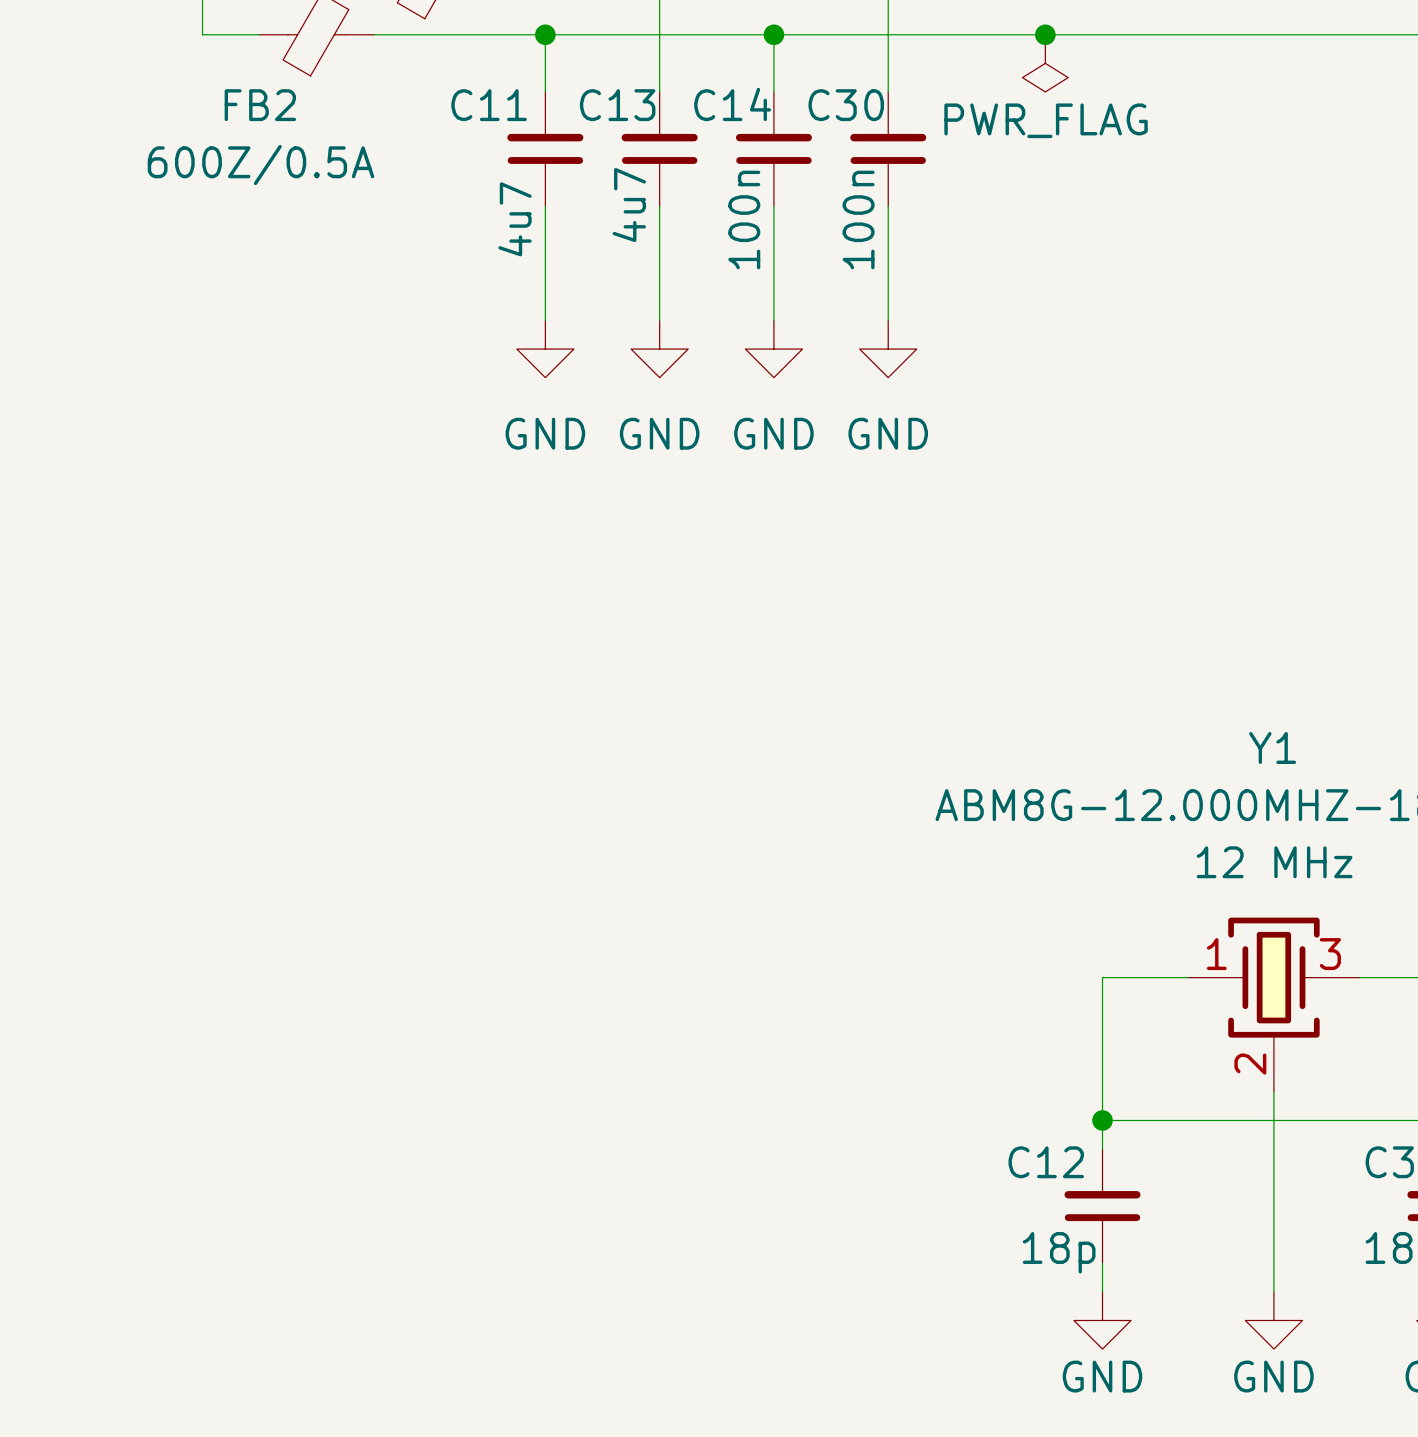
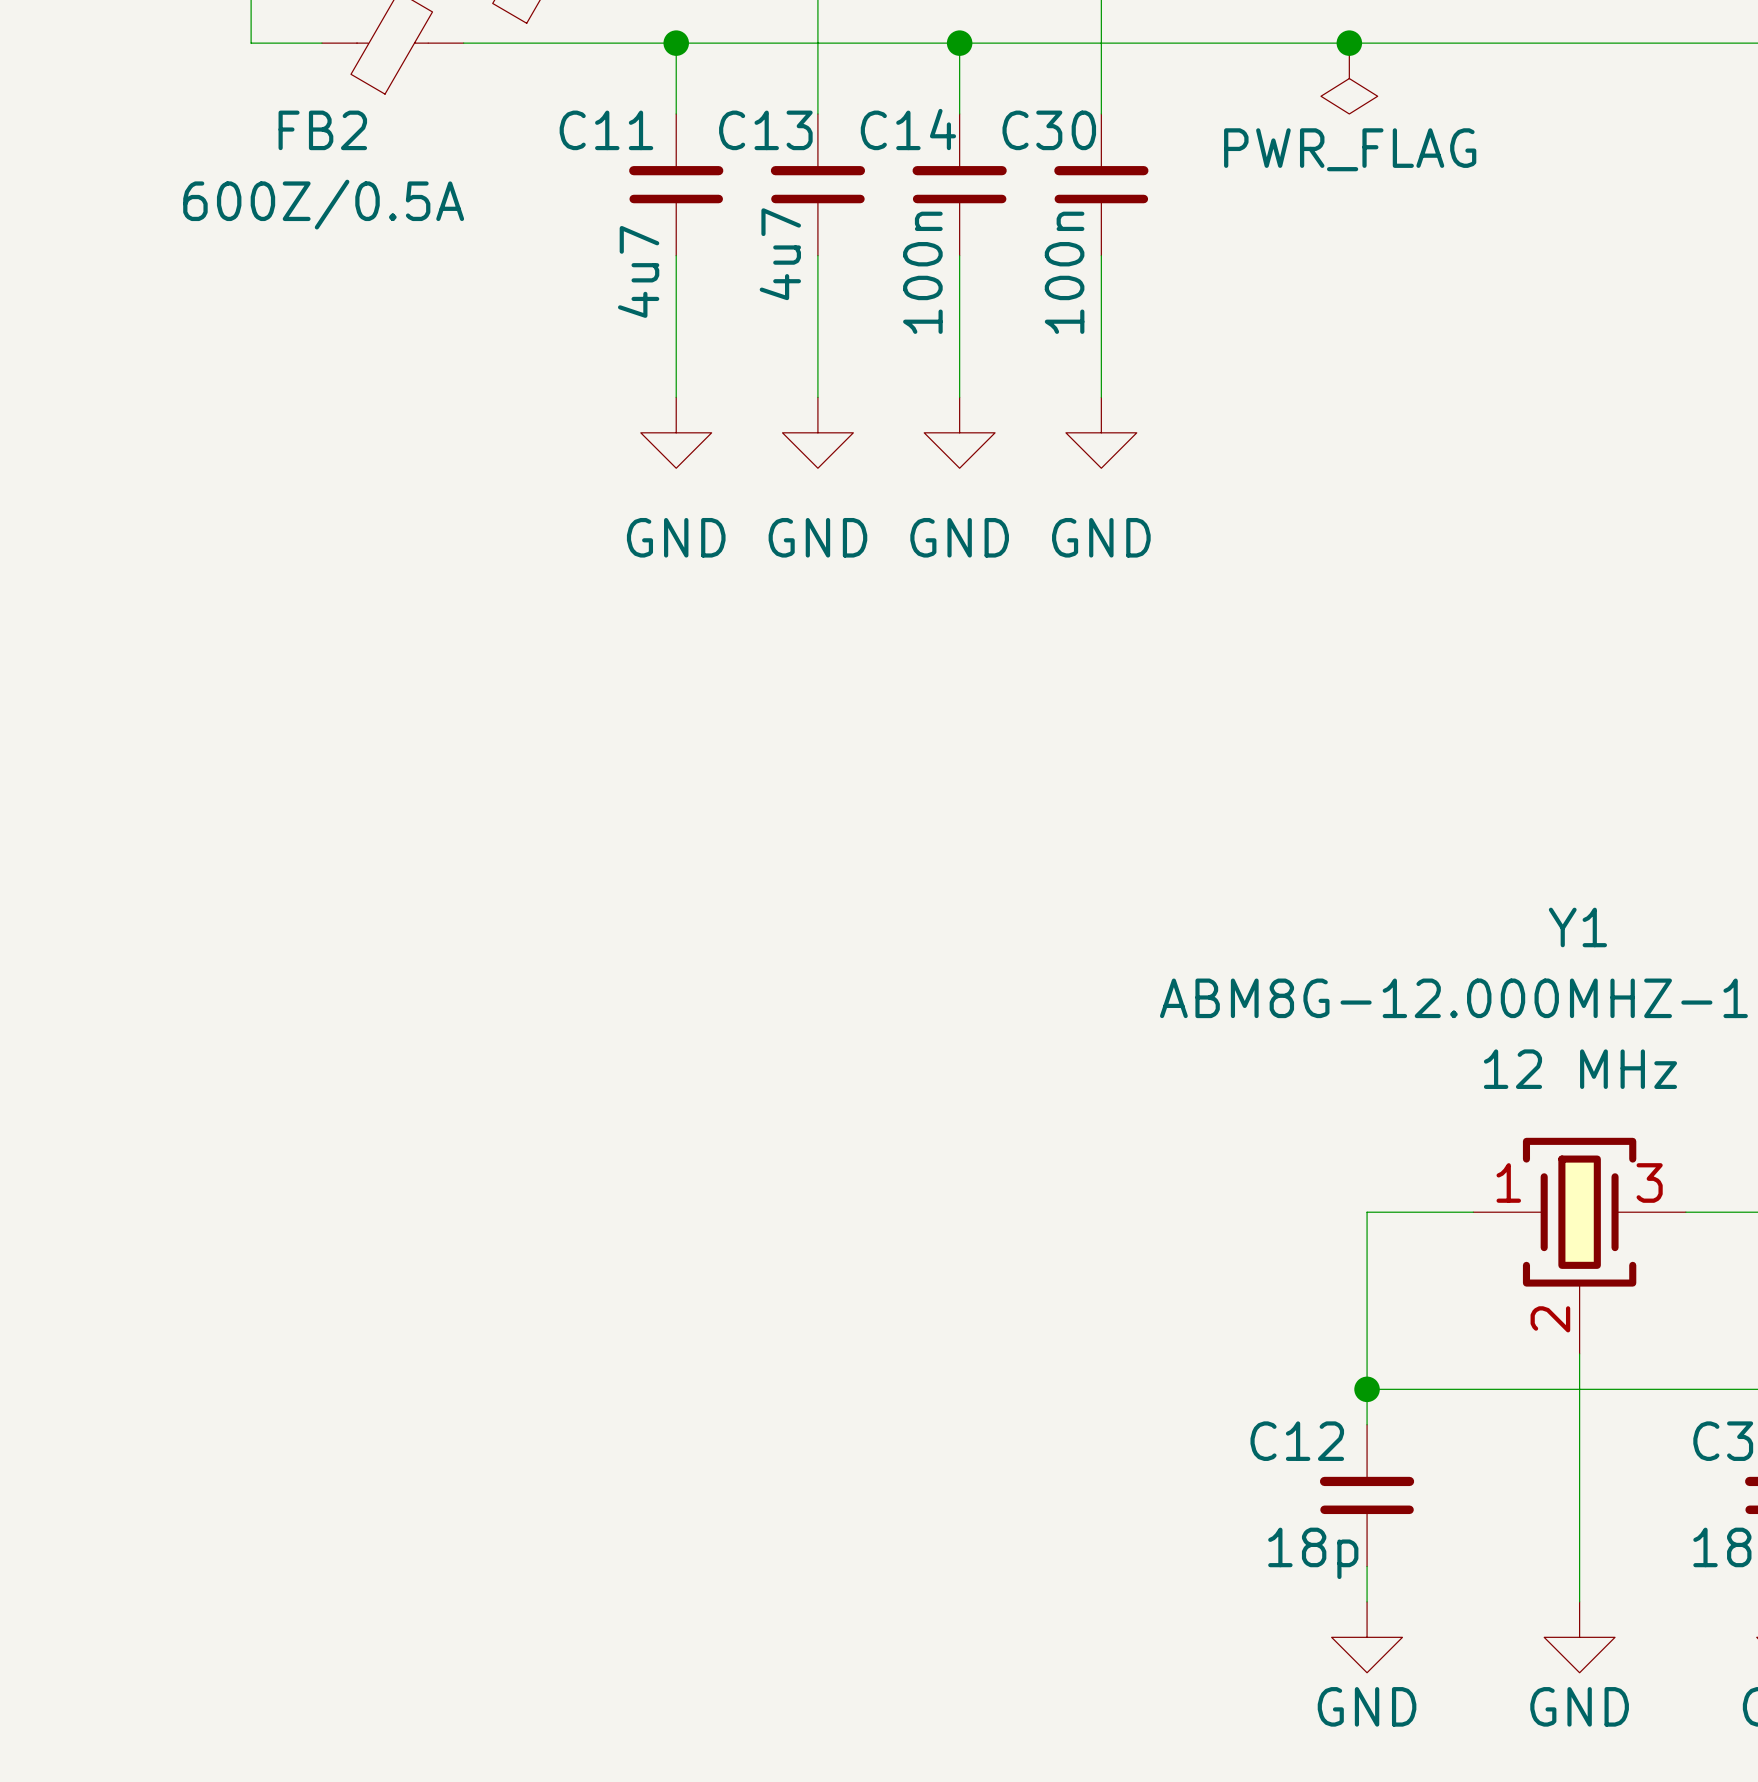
junction: (1045, 34) -> none
junction: none -> (1349, 43)
power symbol position: PWR_FLAG (1045, 63) -> PWR_FLAG (1349, 78)

